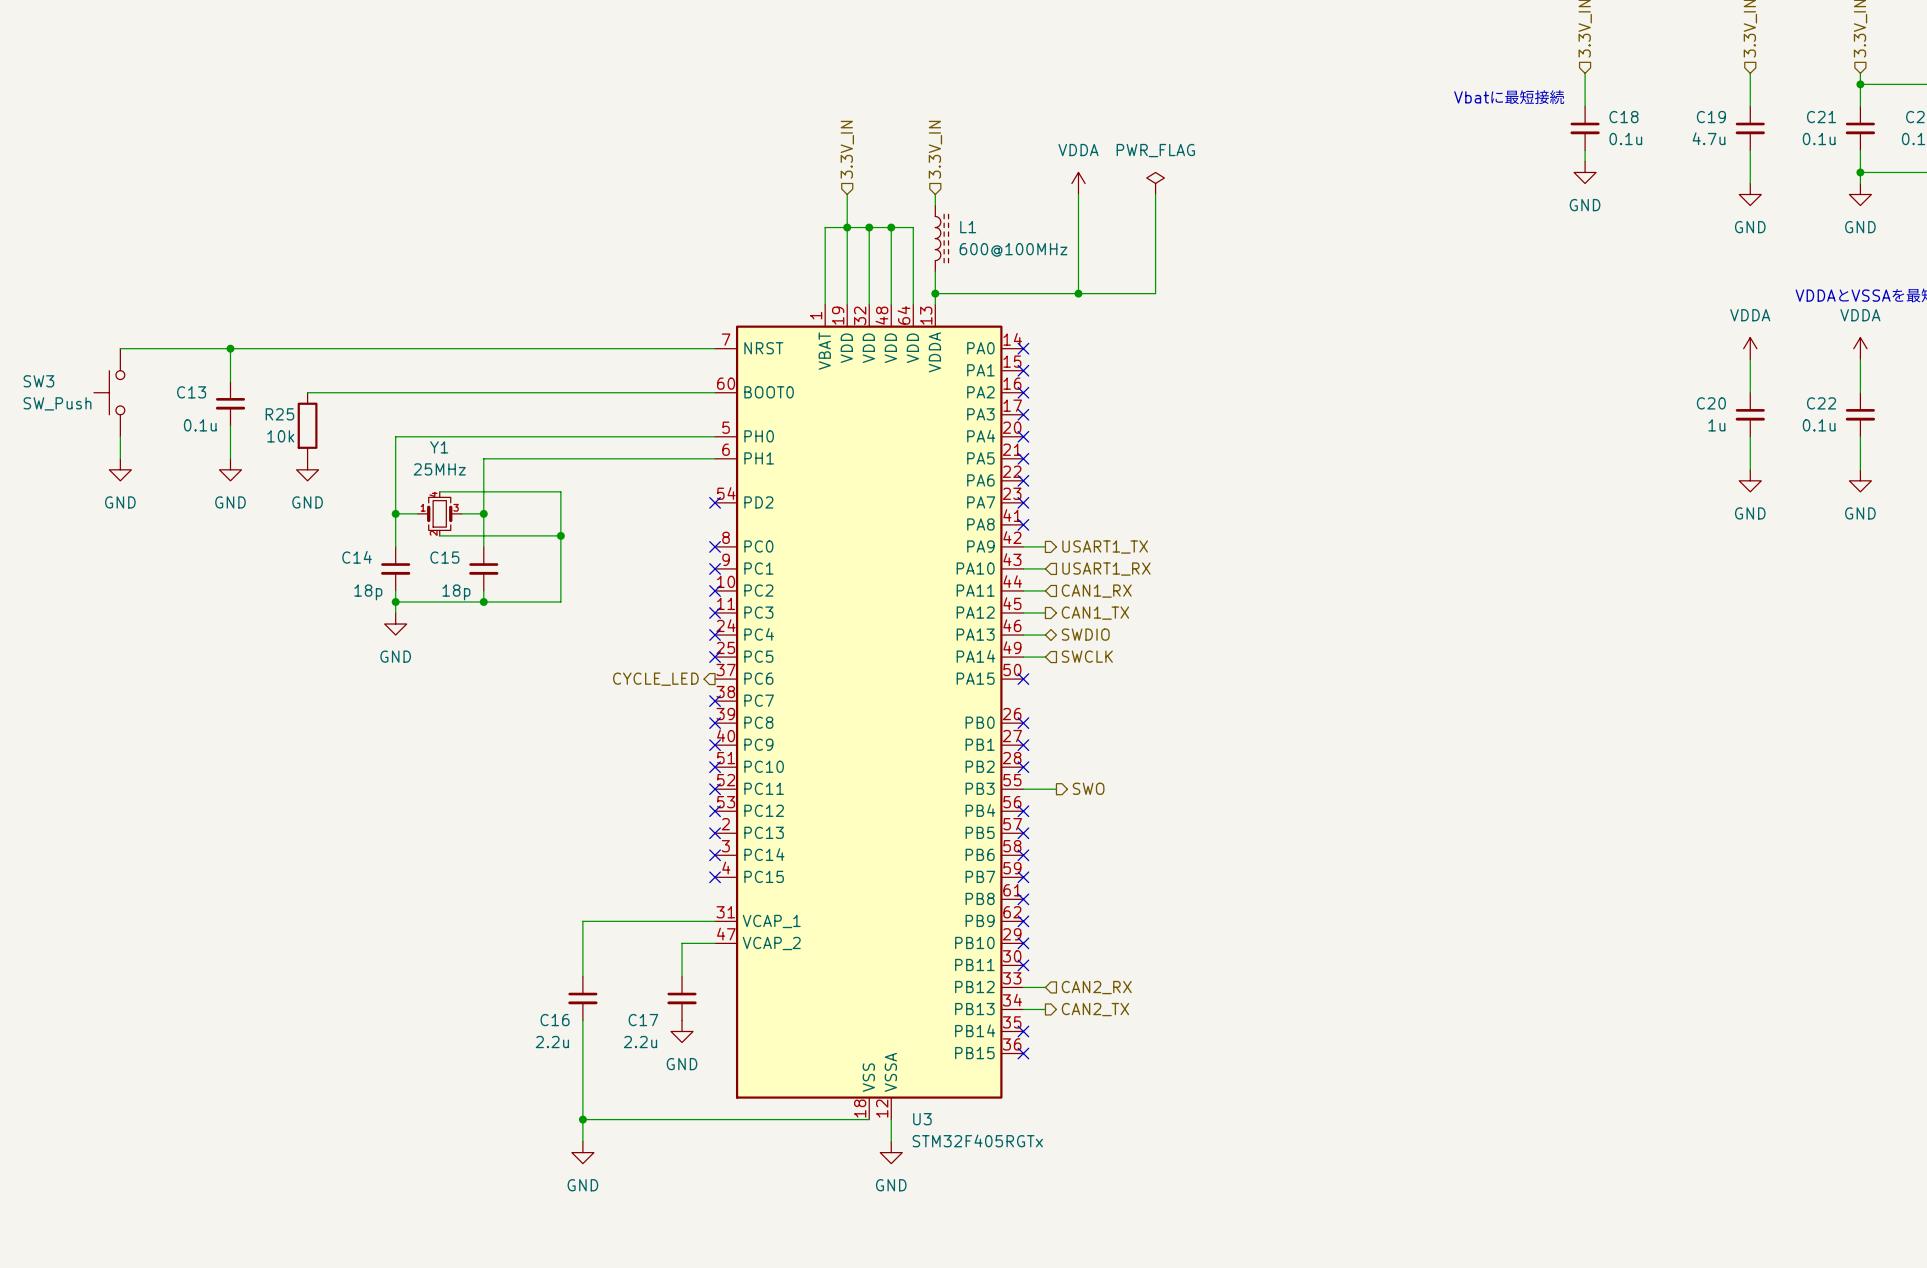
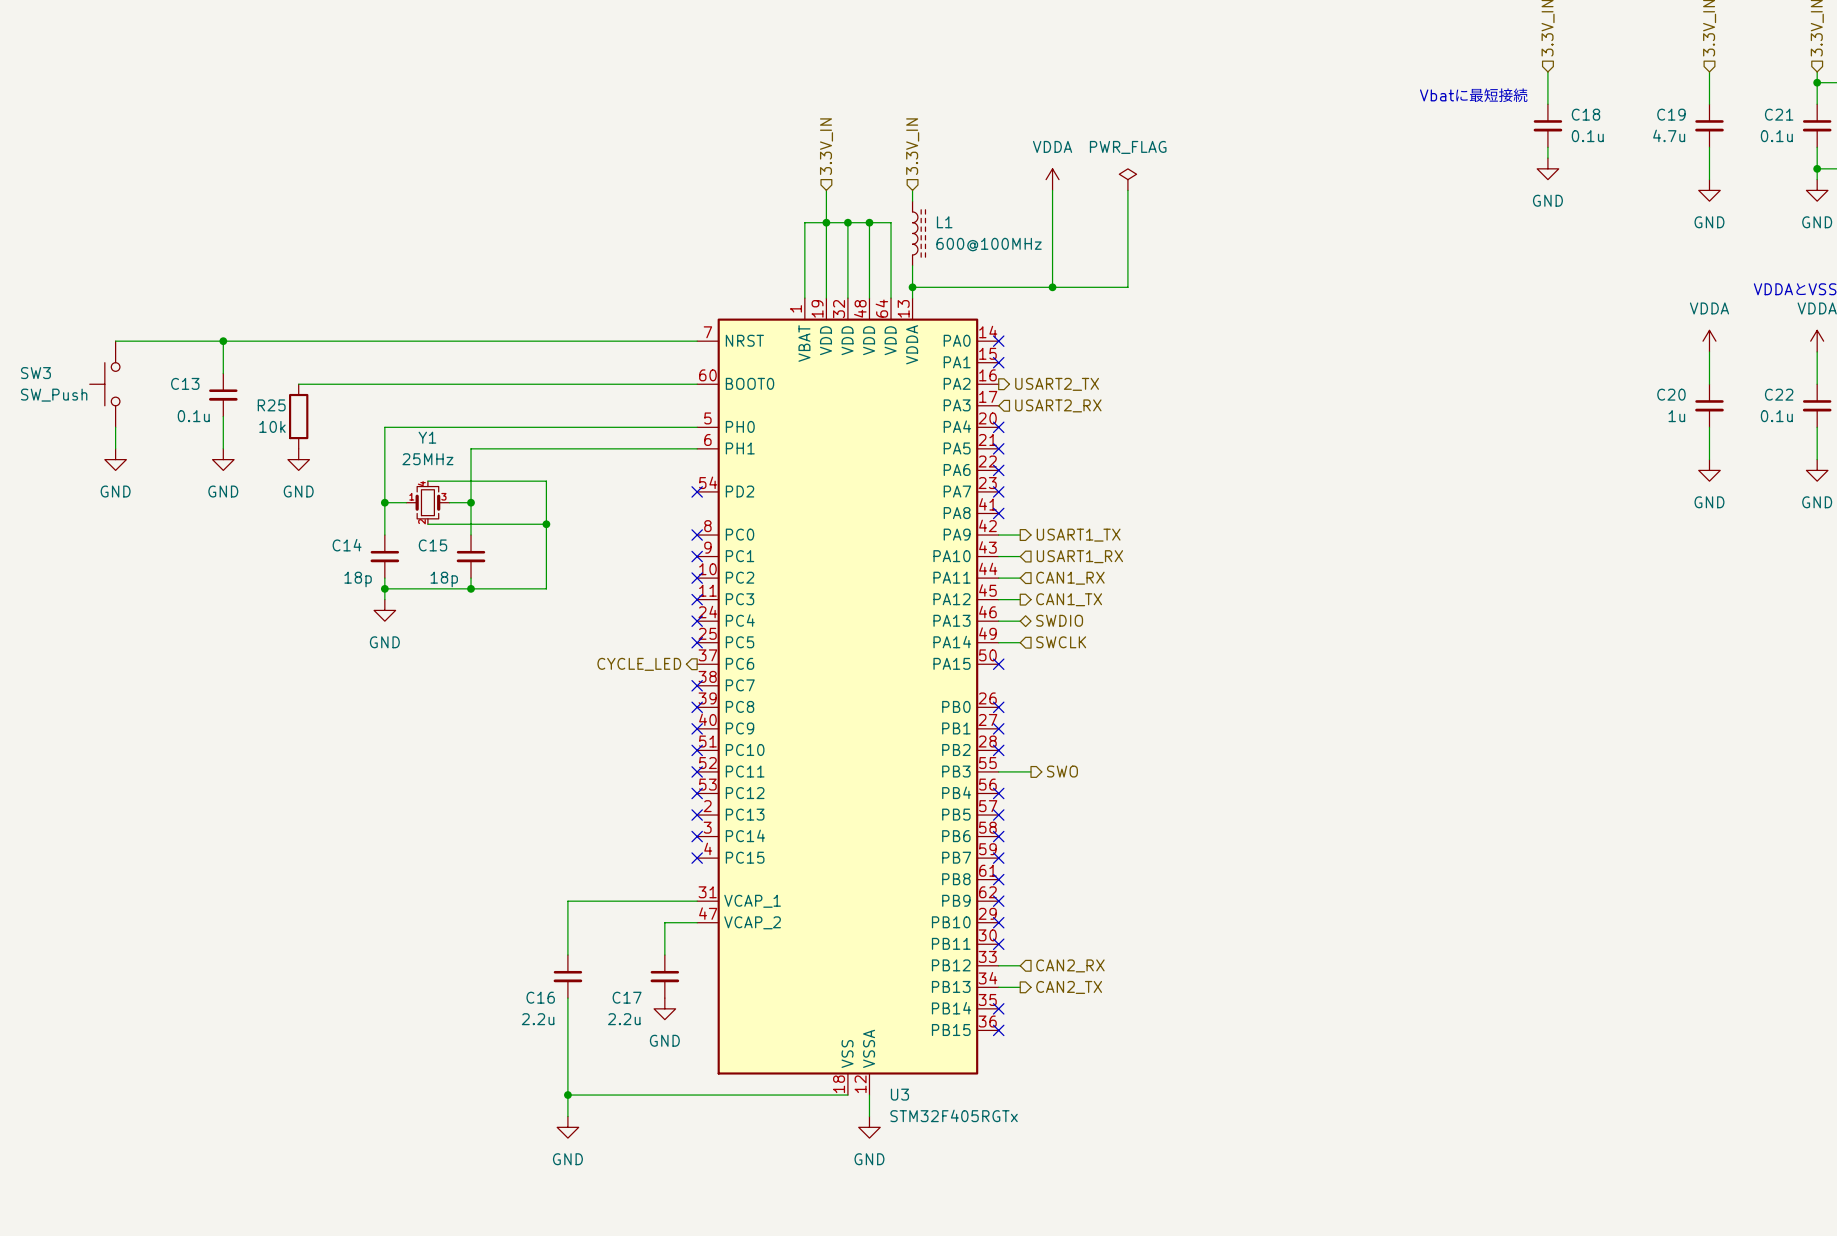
no-connect mark: (1023, 392) -> none
hierarchical label: none -> USART2_TX (1057, 384)
no-connect mark: (1023, 414) -> none
hierarchical label: none -> USART2_RX (1058, 405)

